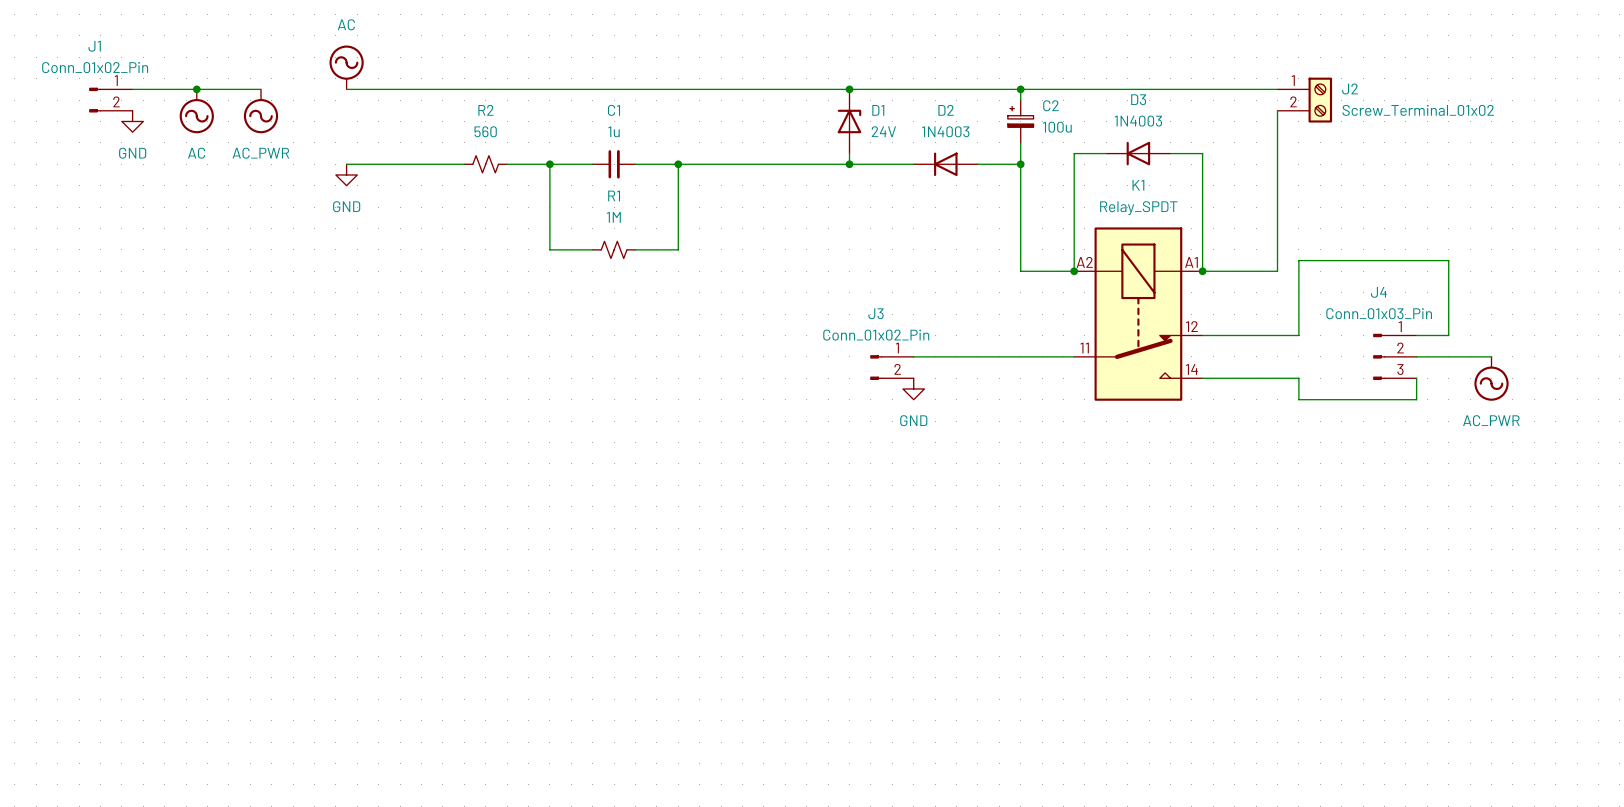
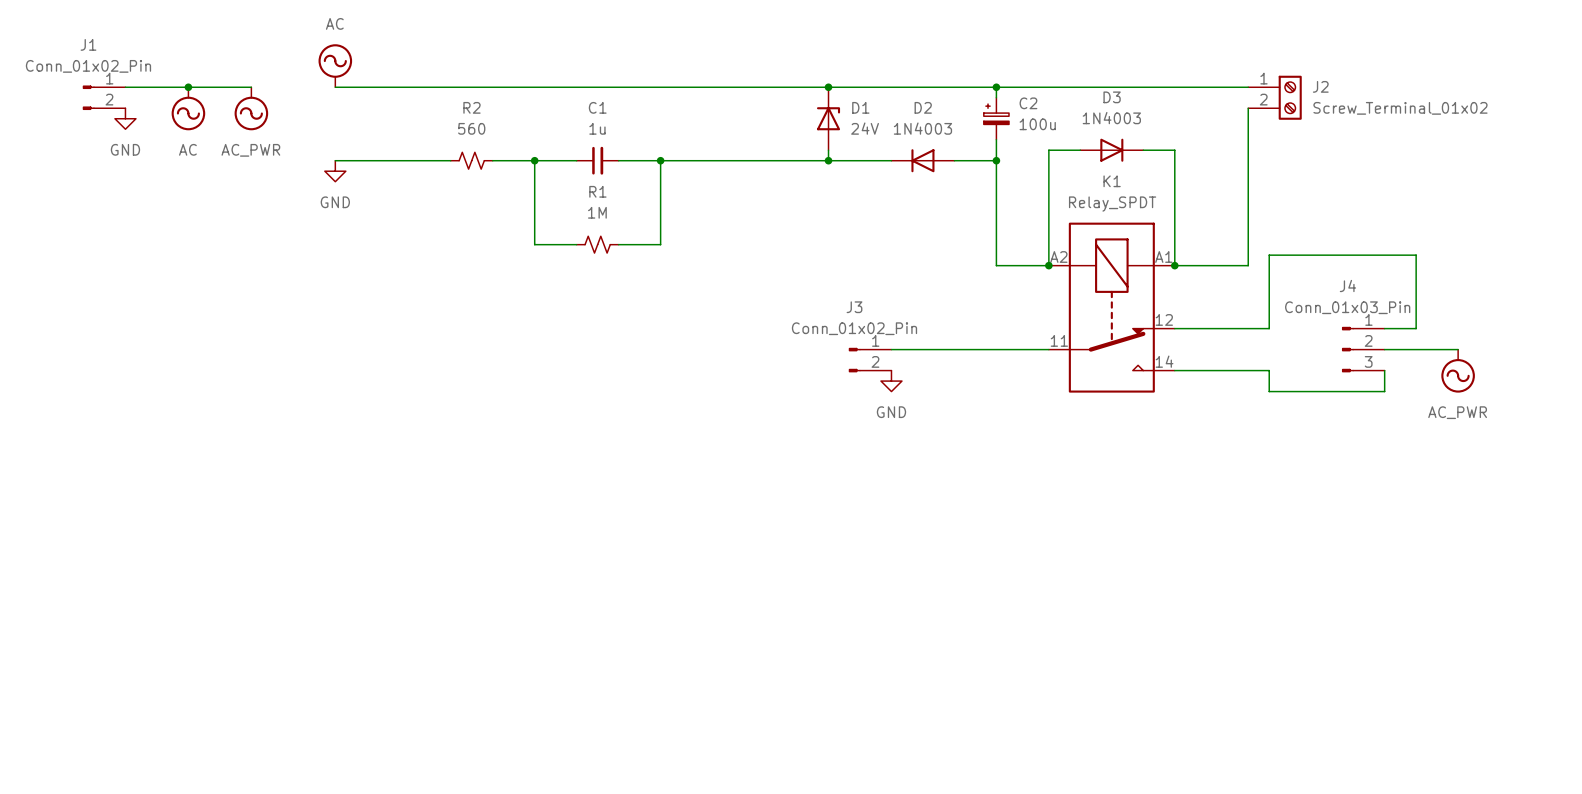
D3 rotation: 0° (1138, 153) -> 180° (1111, 150)

